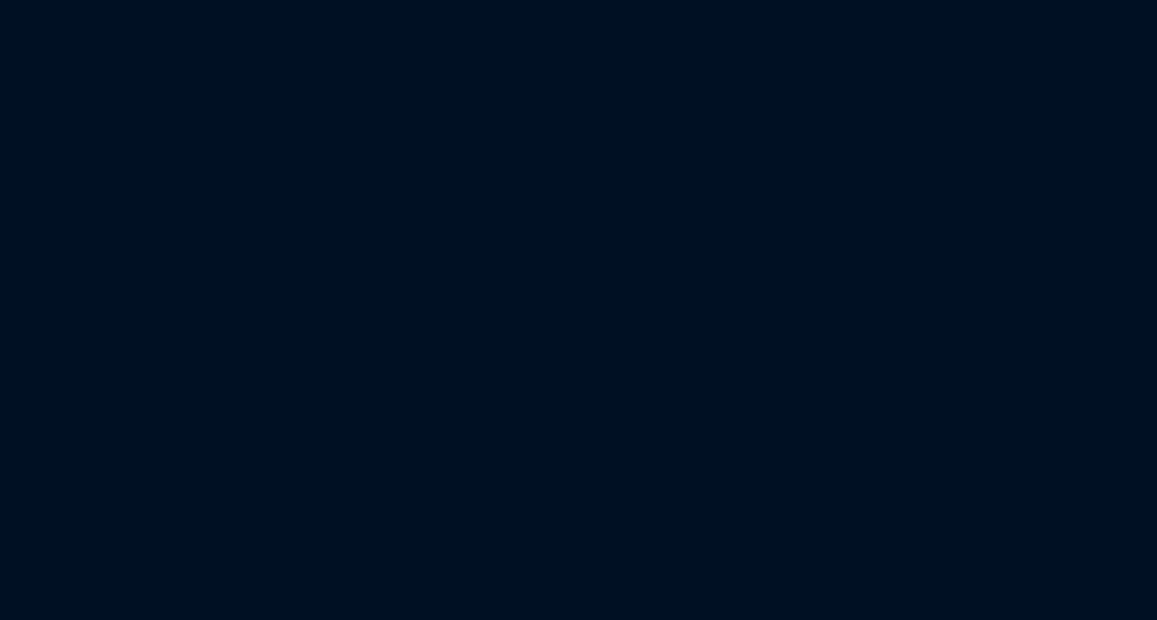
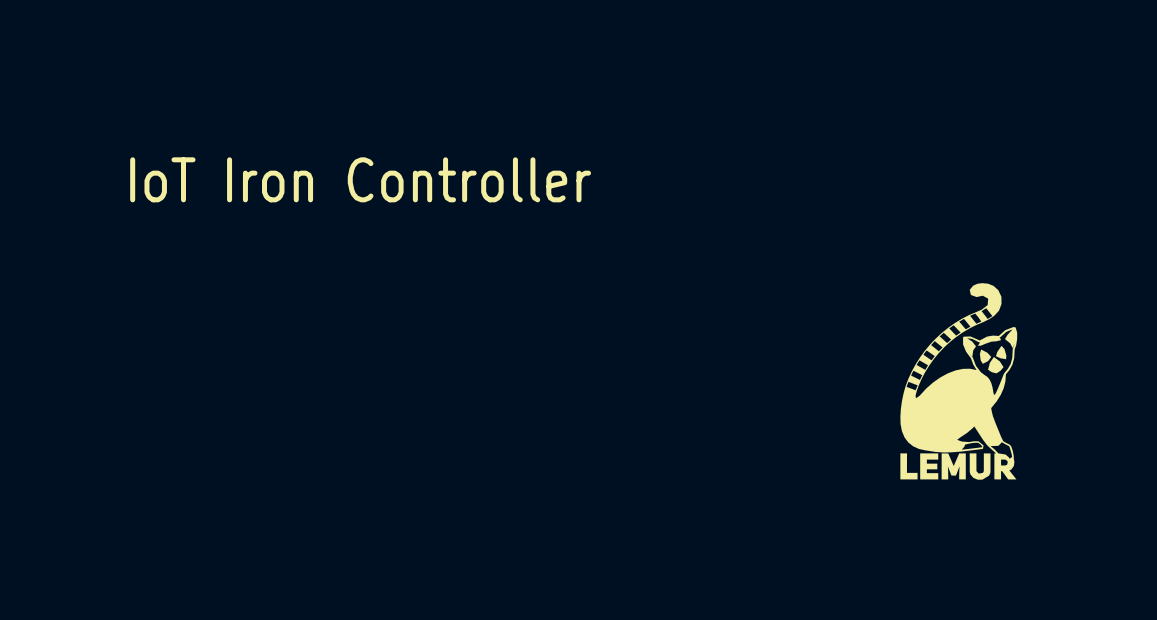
text: none -> IoT Iron Controller (360, 179)
drawing: none -> [900, 283, 1018, 480]

